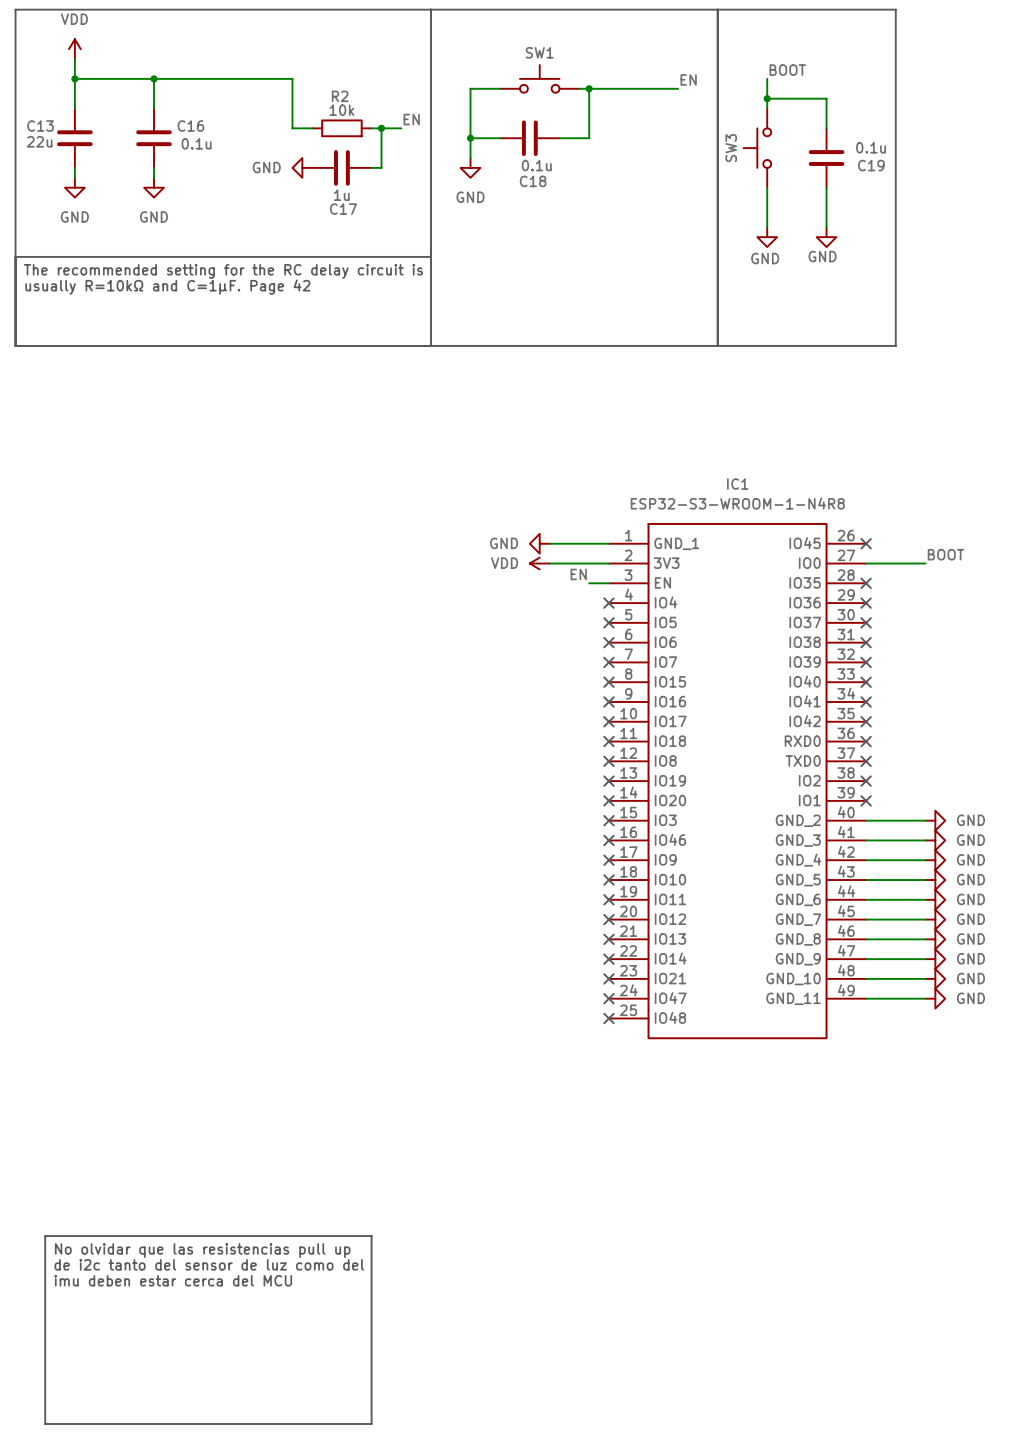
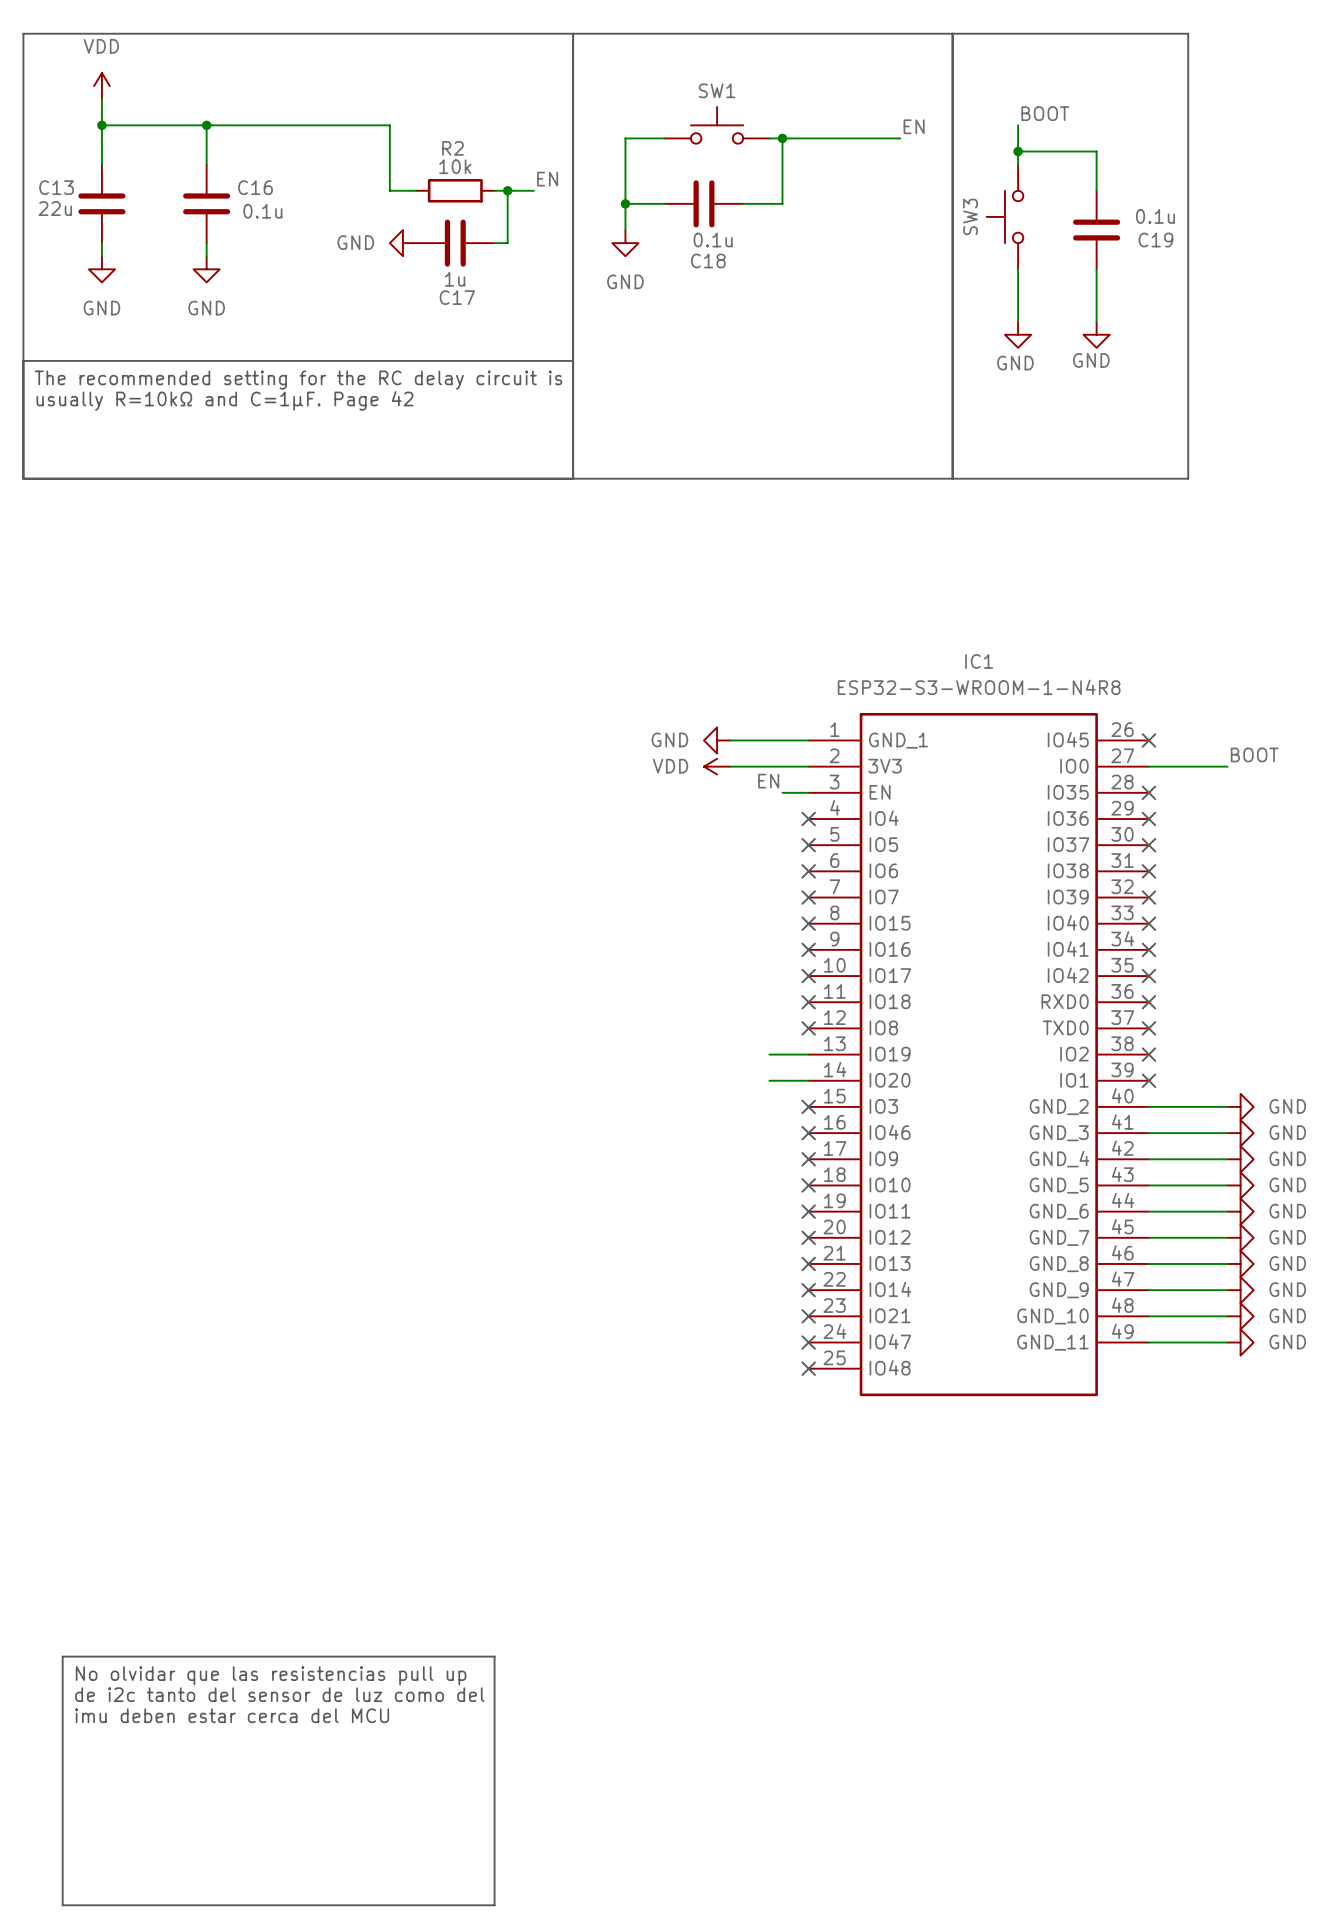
wire: none -> (769, 1054) (808, 1054)
no-connect mark: (608, 781) -> none
wire: none -> (769, 1080) (808, 1080)
no-connect mark: (608, 800) -> none

